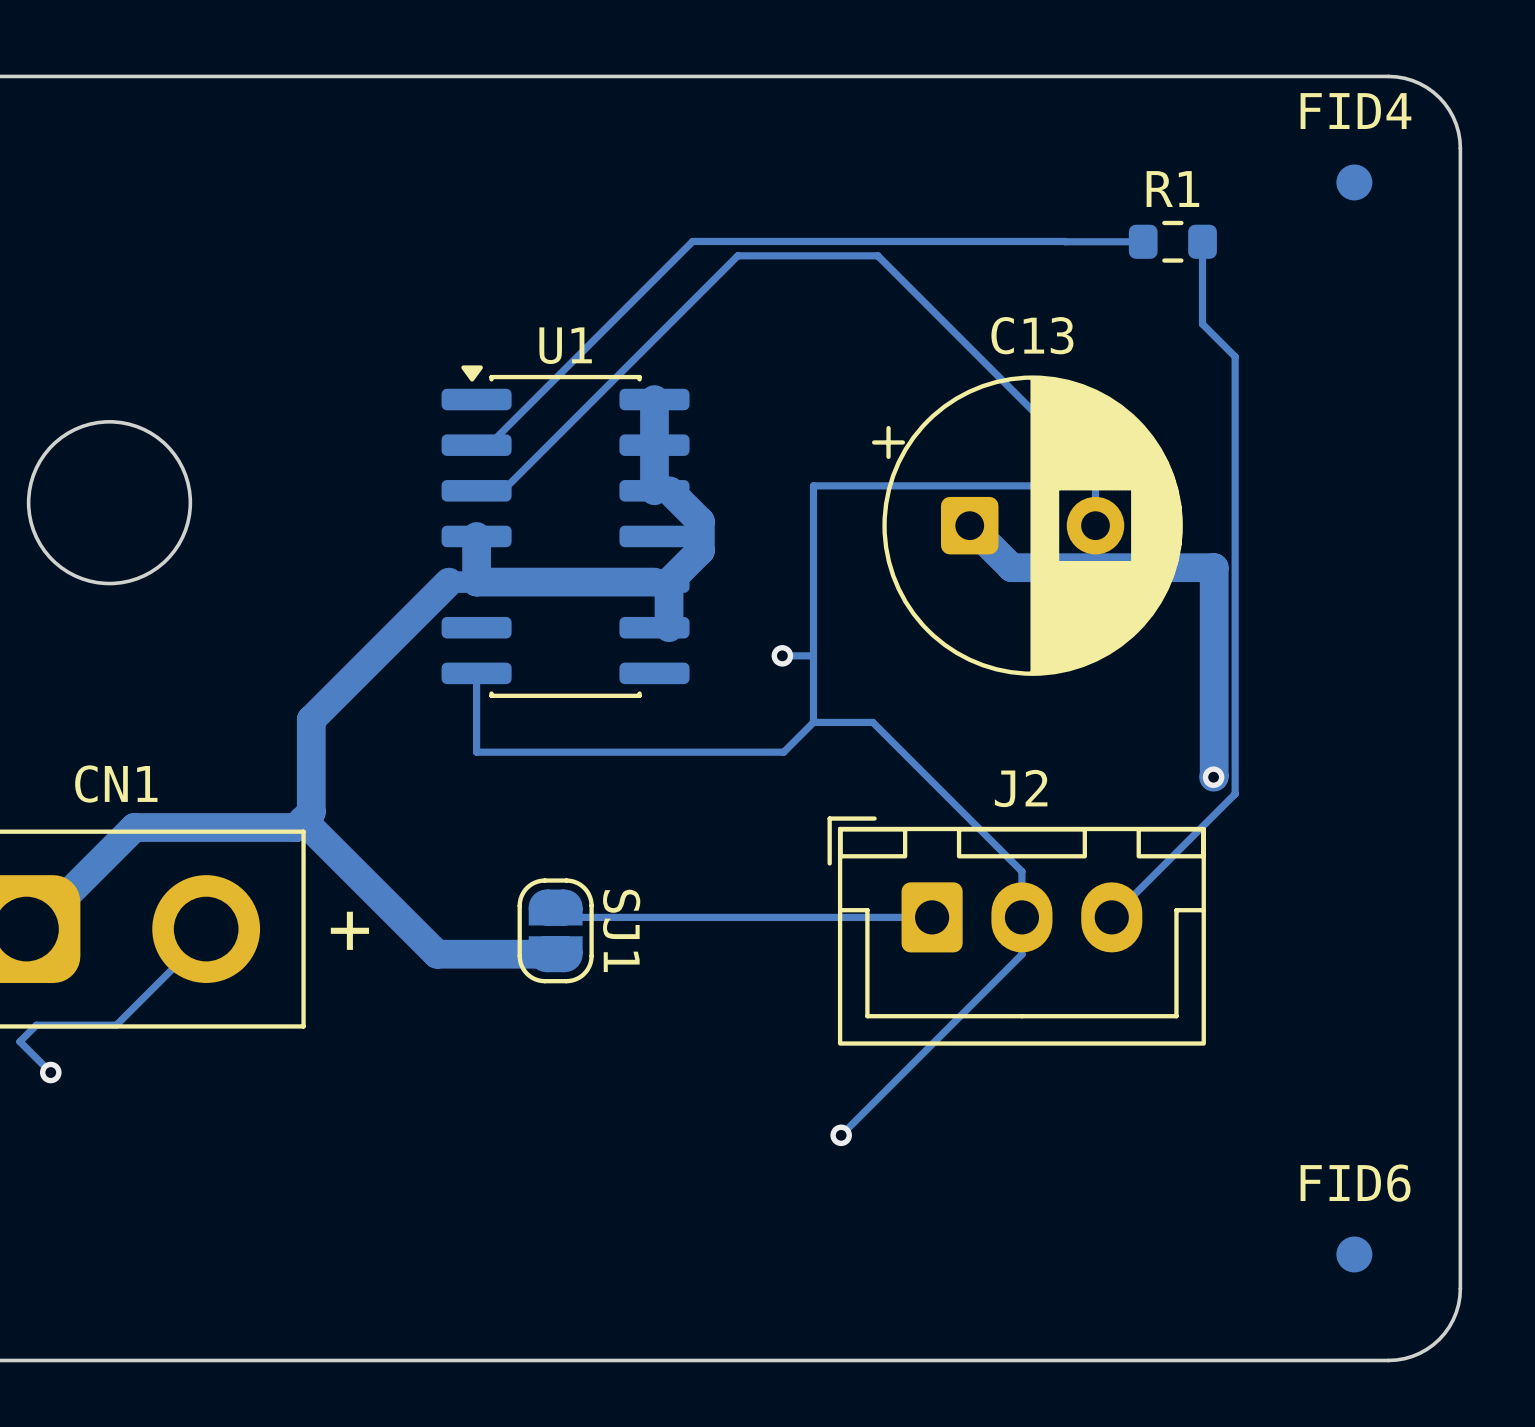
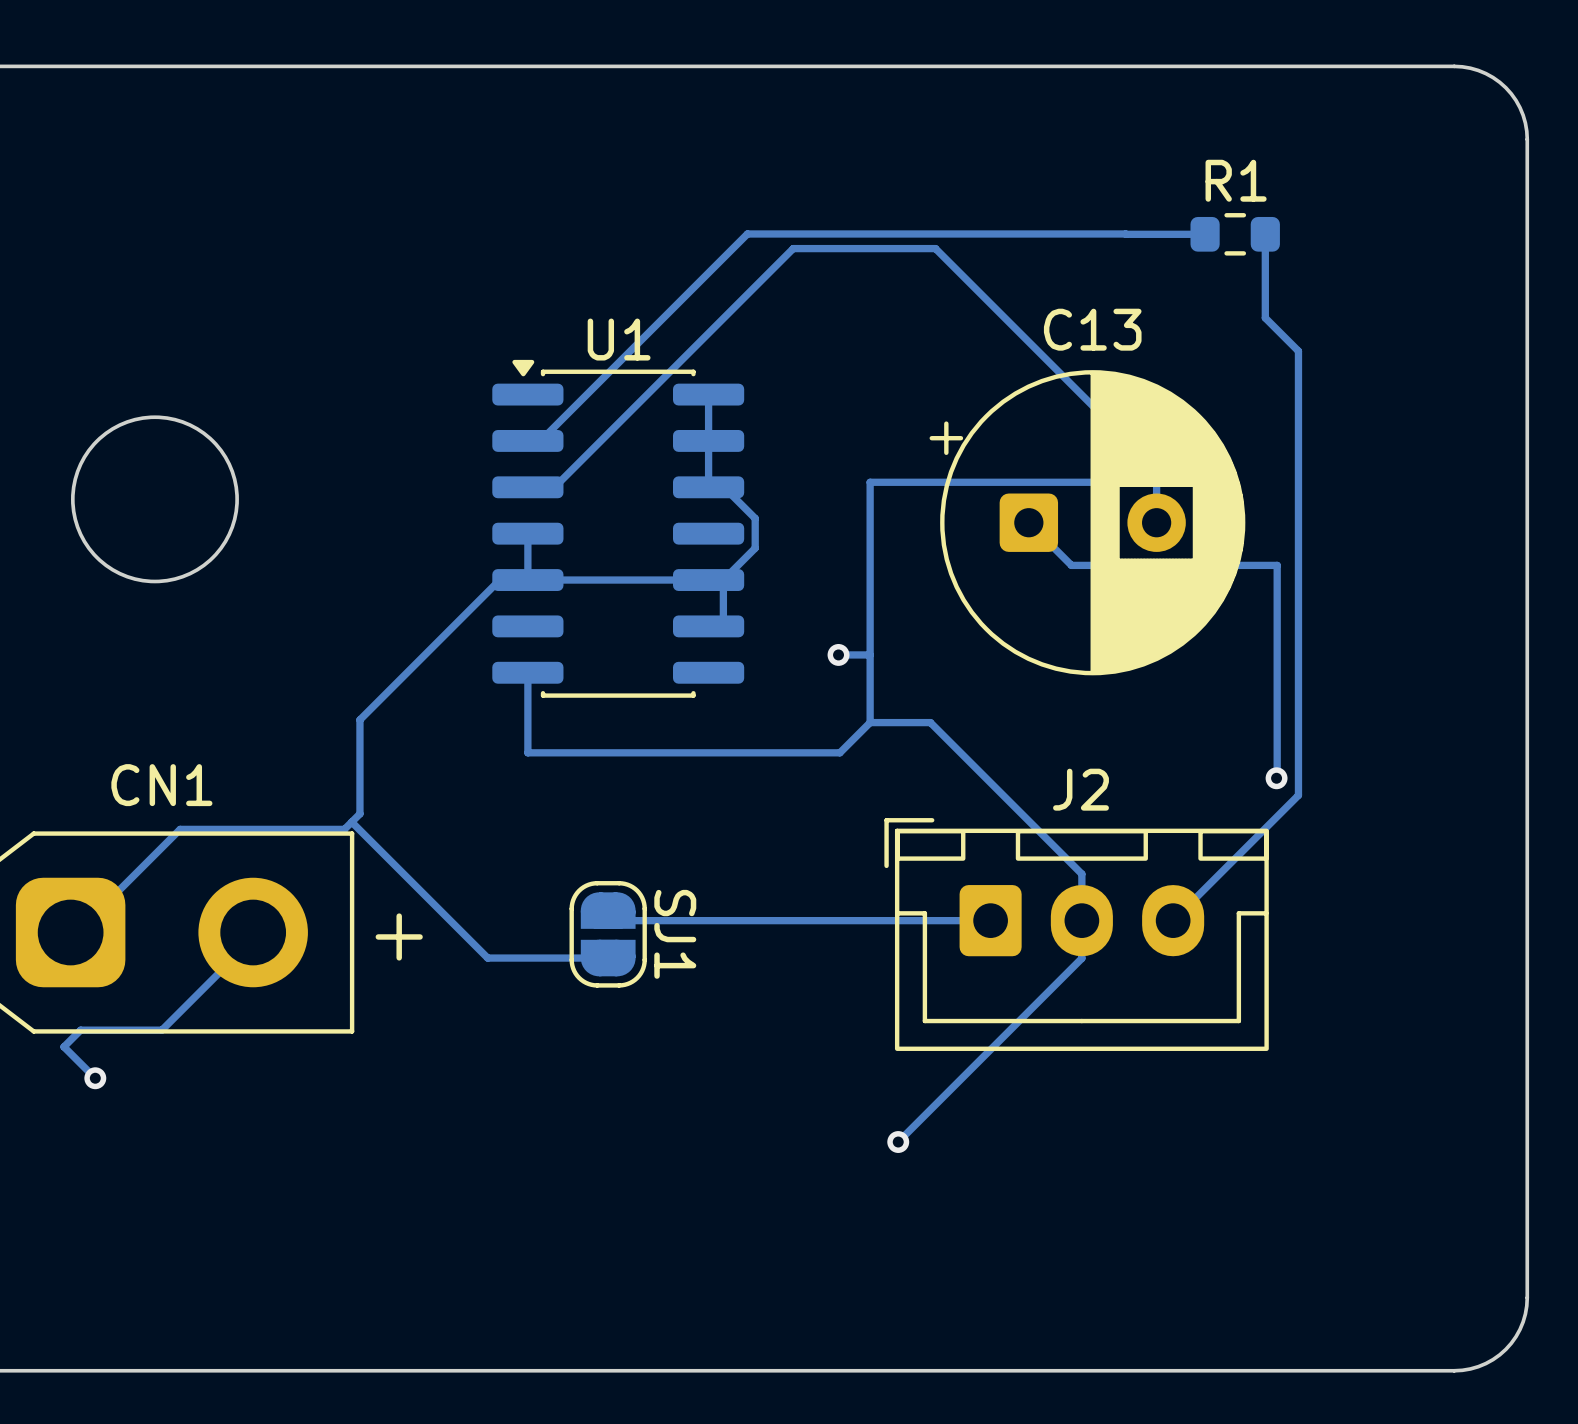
FID4: (1354, 182) -> none
track width: thick (654, 399) (654, 490) -> thin (708, 394) (708, 487)
track width: thick (669, 490) (700, 521) (700, 550) (669, 582) (669, 627) -> thin (724, 487) (755, 518) (755, 548) (723, 580) (723, 626)
track width: thick (969, 525) (1011, 567) (1214, 567) (1213, 777) -> thin (1028, 522) (1071, 565) (1277, 565) (1276, 778)
track width: thick (476, 536) (476, 582) (654, 582) -> thin (527, 533) (527, 580) (708, 580)
track width: thick (448, 582) (311, 719) (311, 812) (296, 827) (134, 827) (37, 924) -> thin (499, 580) (359, 719) (359, 813) (344, 829) (180, 829) (81, 927)
track width: thick (303, 820) (437, 954) (555, 954) -> thin (351, 822) (487, 958) (608, 958)
FID6: (1354, 1254) -> none

